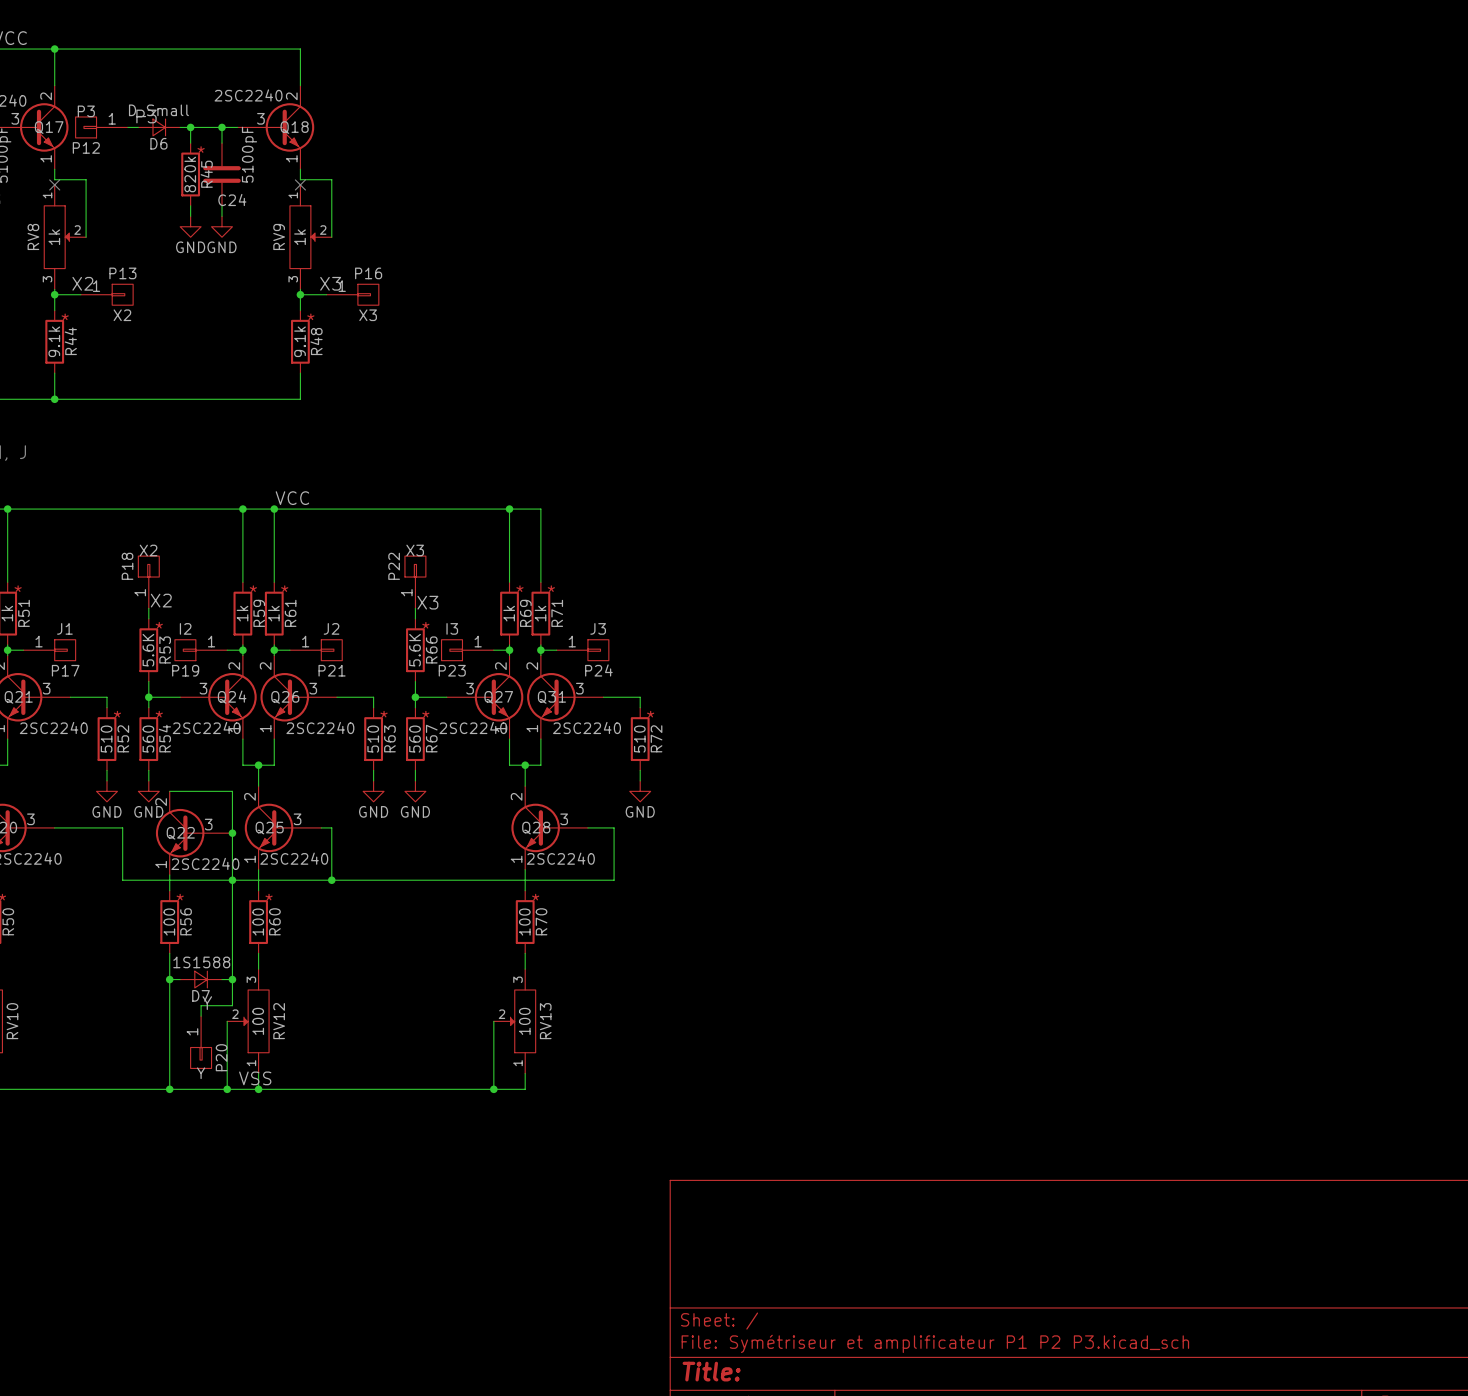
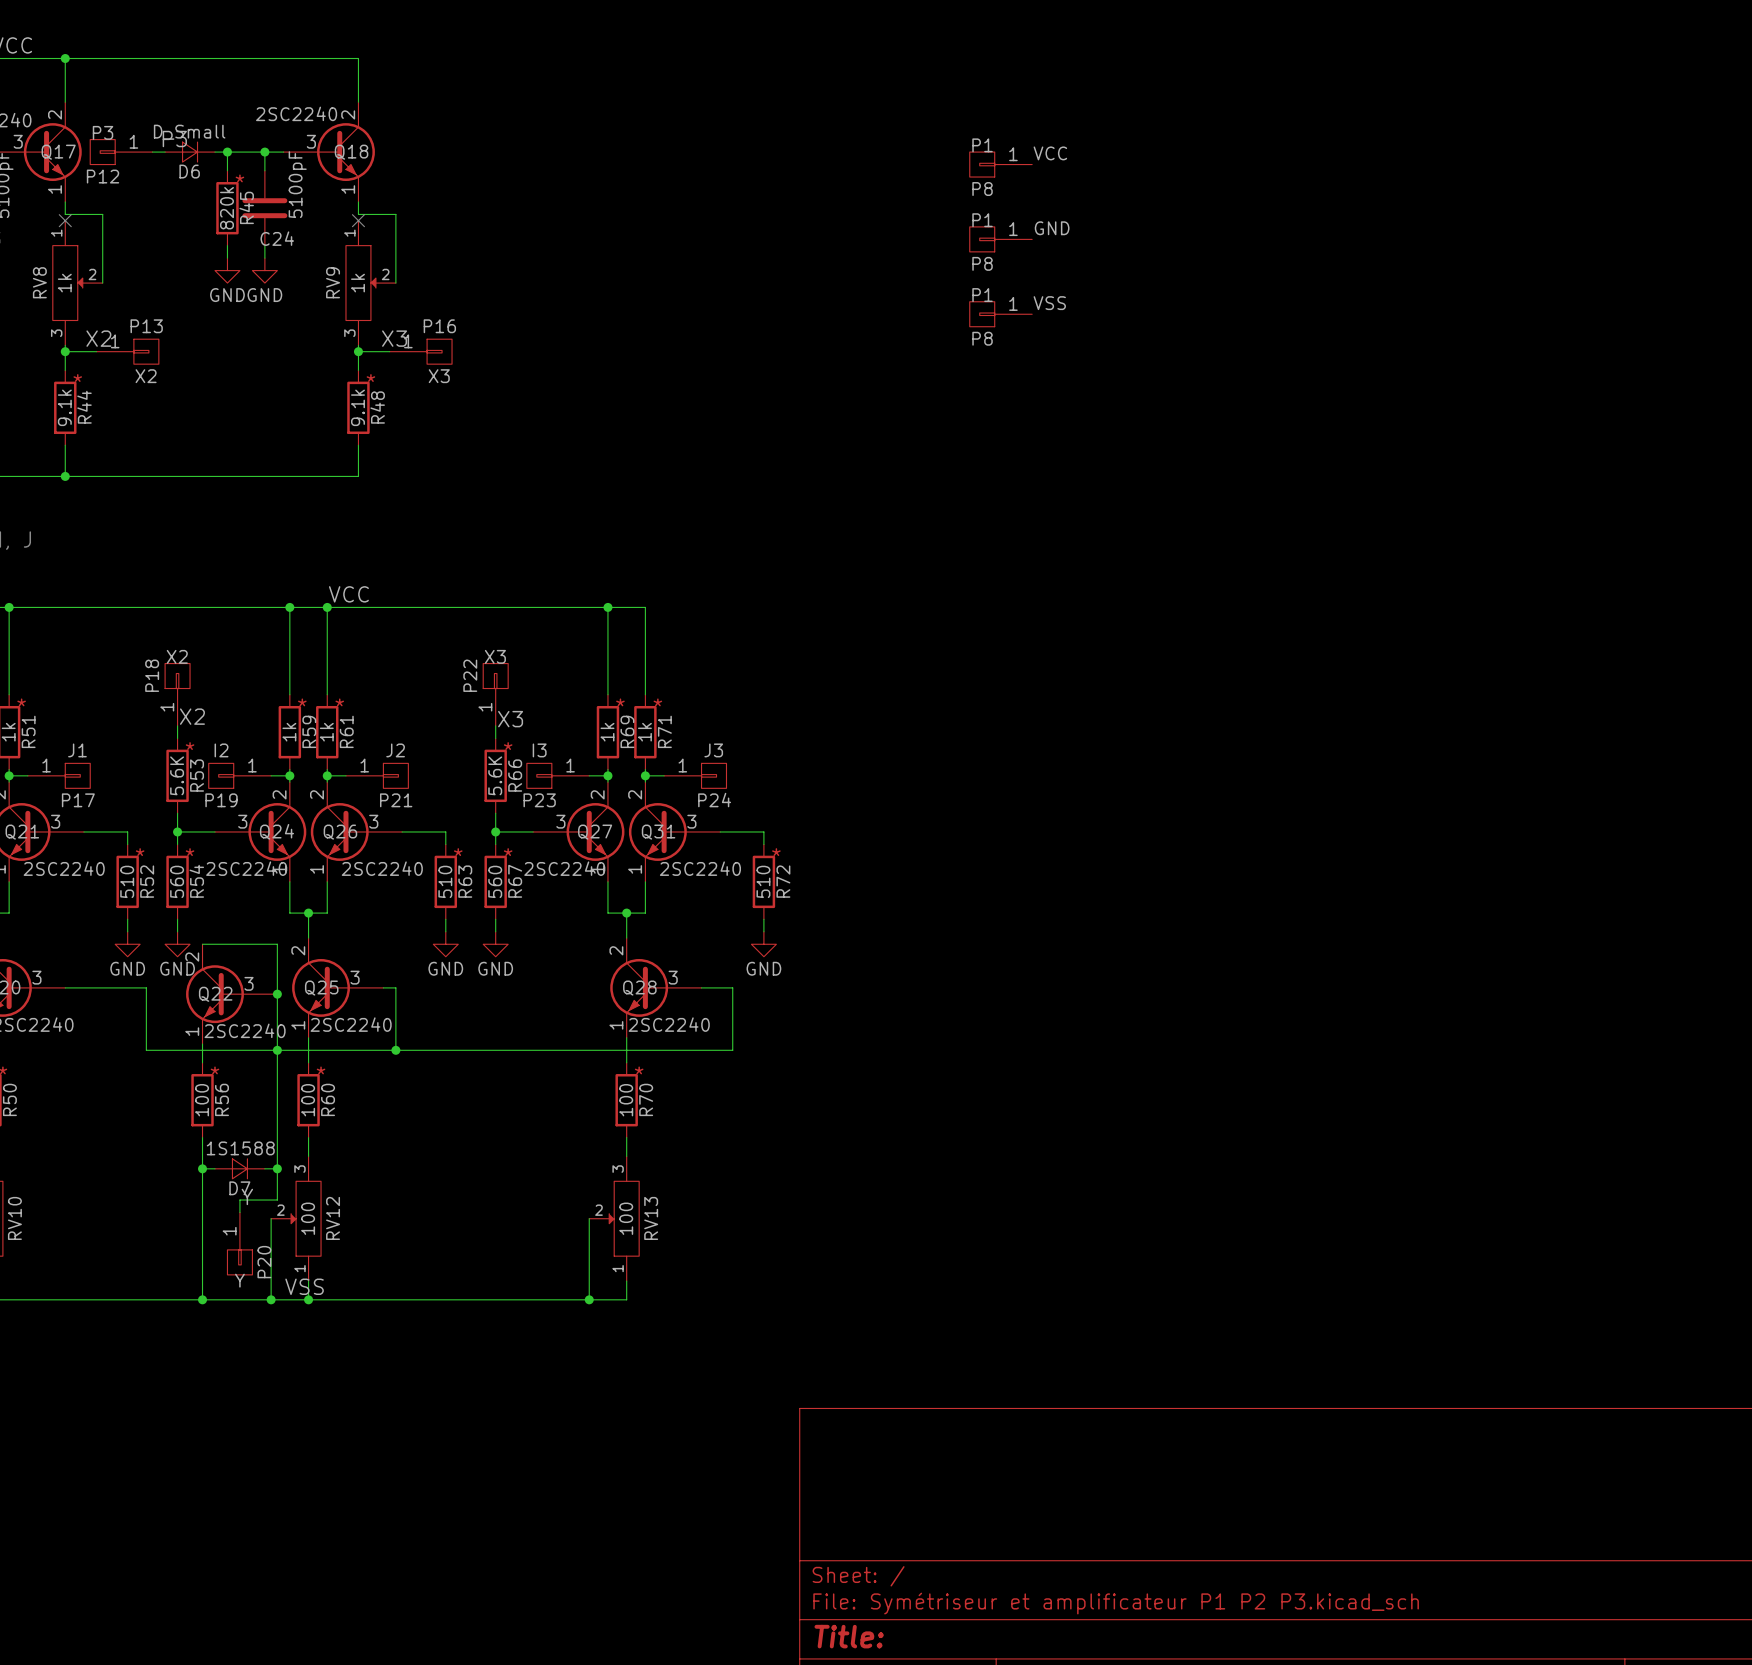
label: none -> VCC (1050, 153)
P8: none -> P1 (1000, 164)
label: none -> GND (1052, 228)
P8: none -> P1 (1000, 239)
label: none -> VSS (1049, 303)
P8: none -> P1 (1000, 314)

